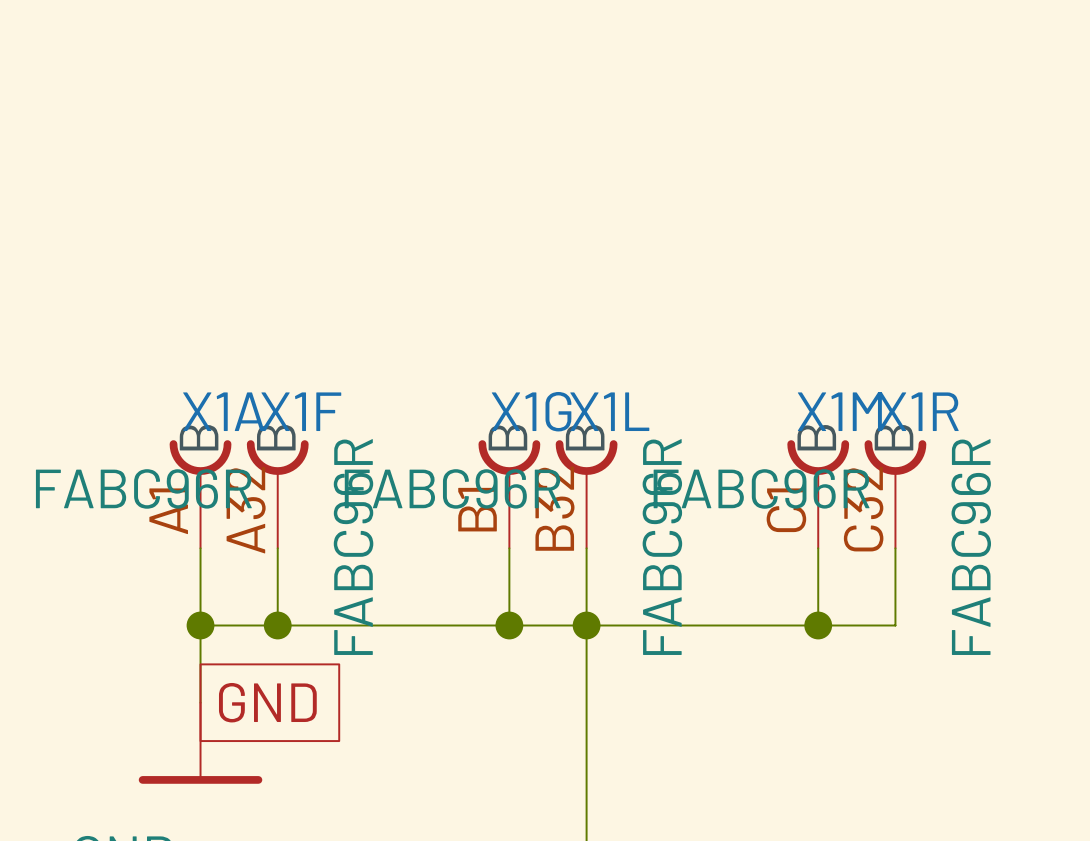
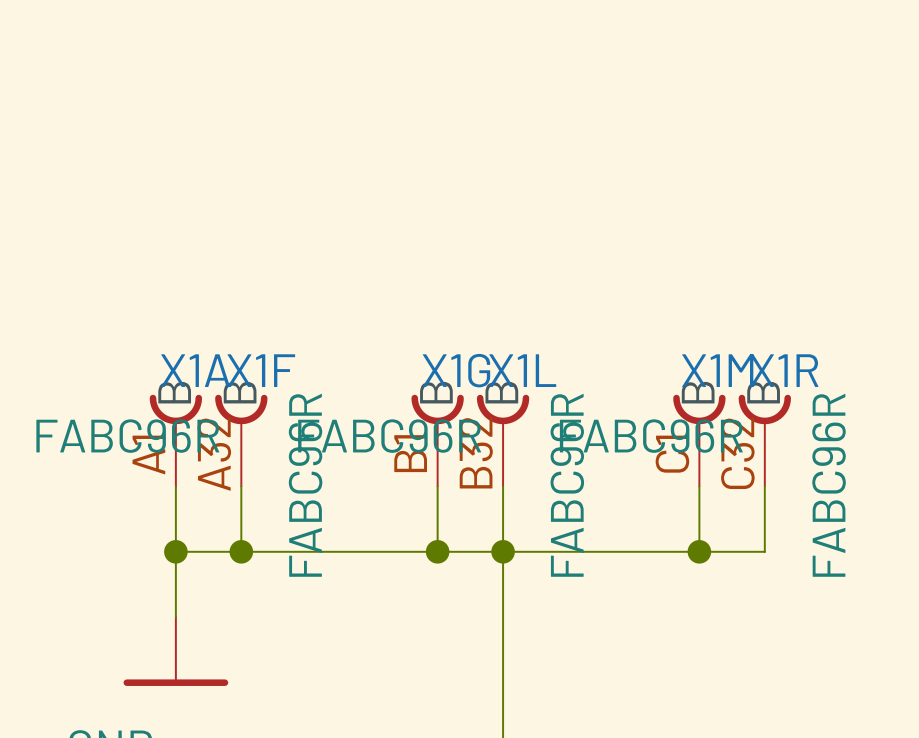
global label: GND (267, 702) -> none

